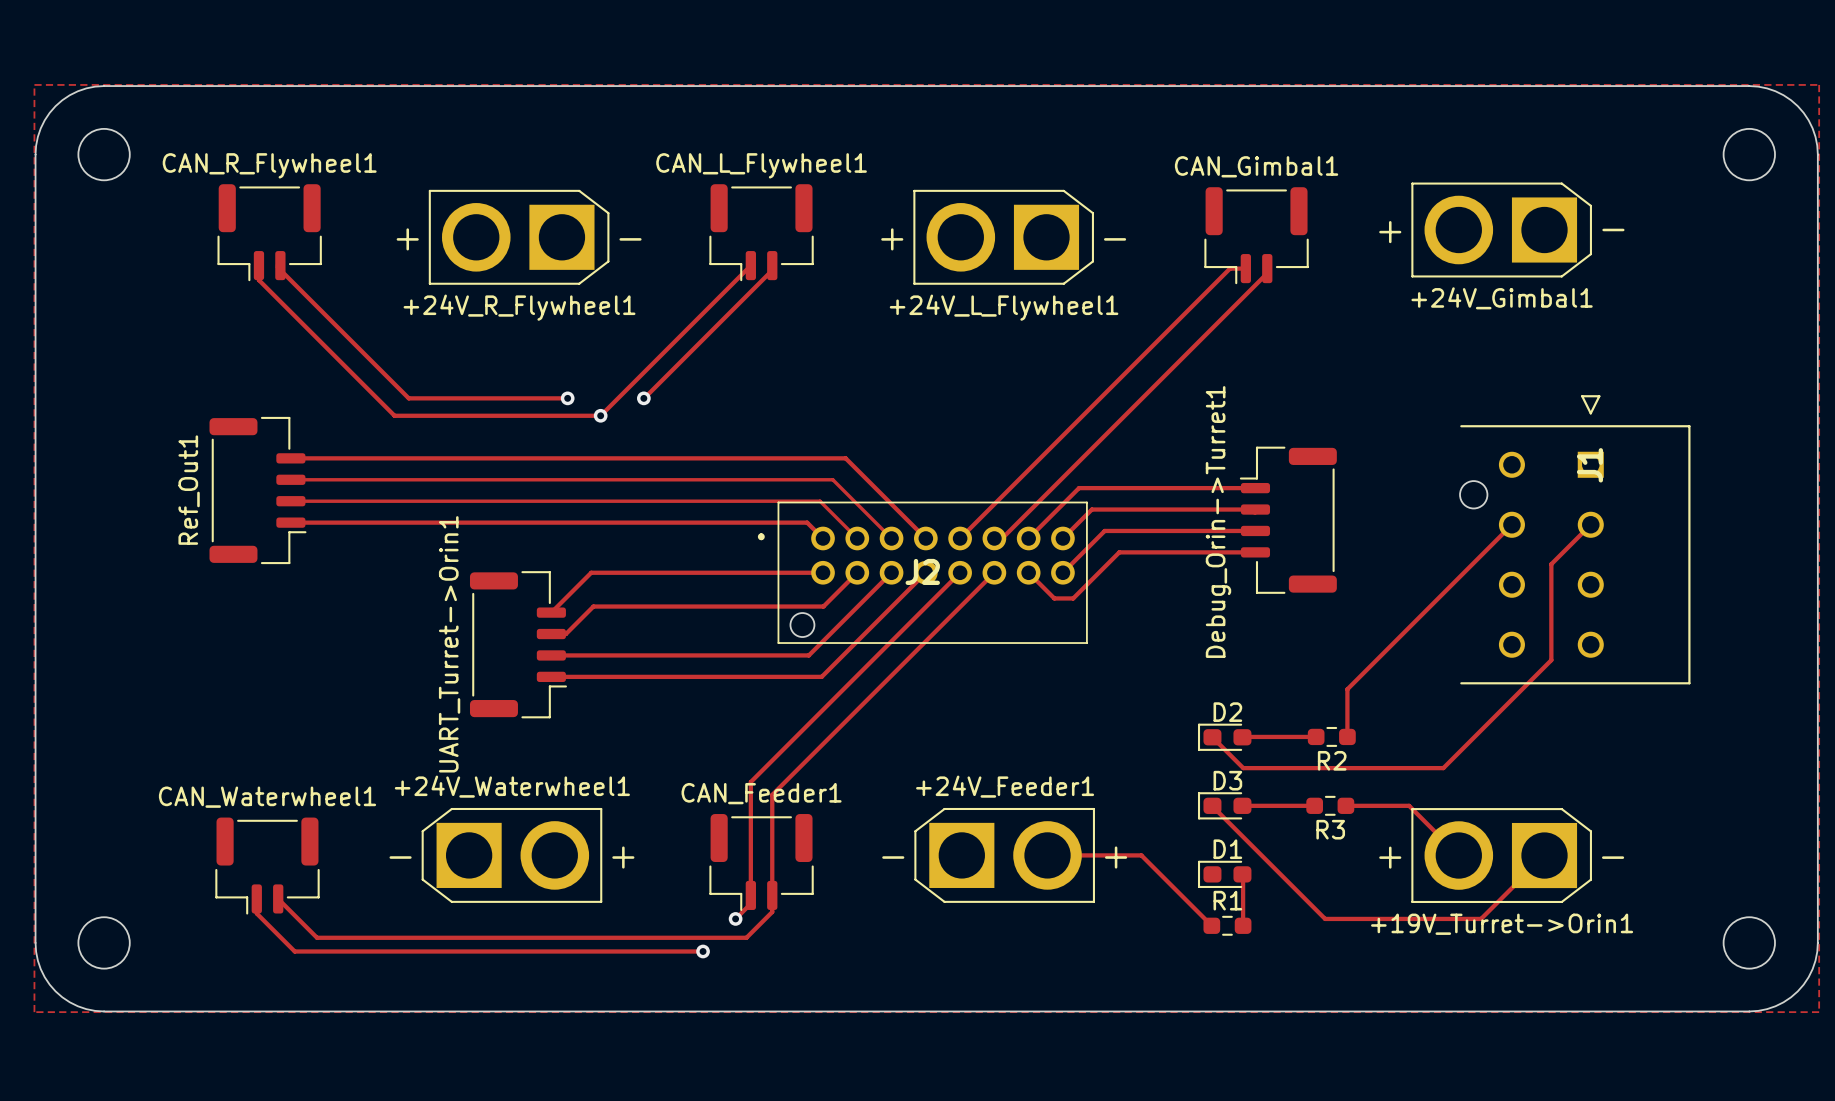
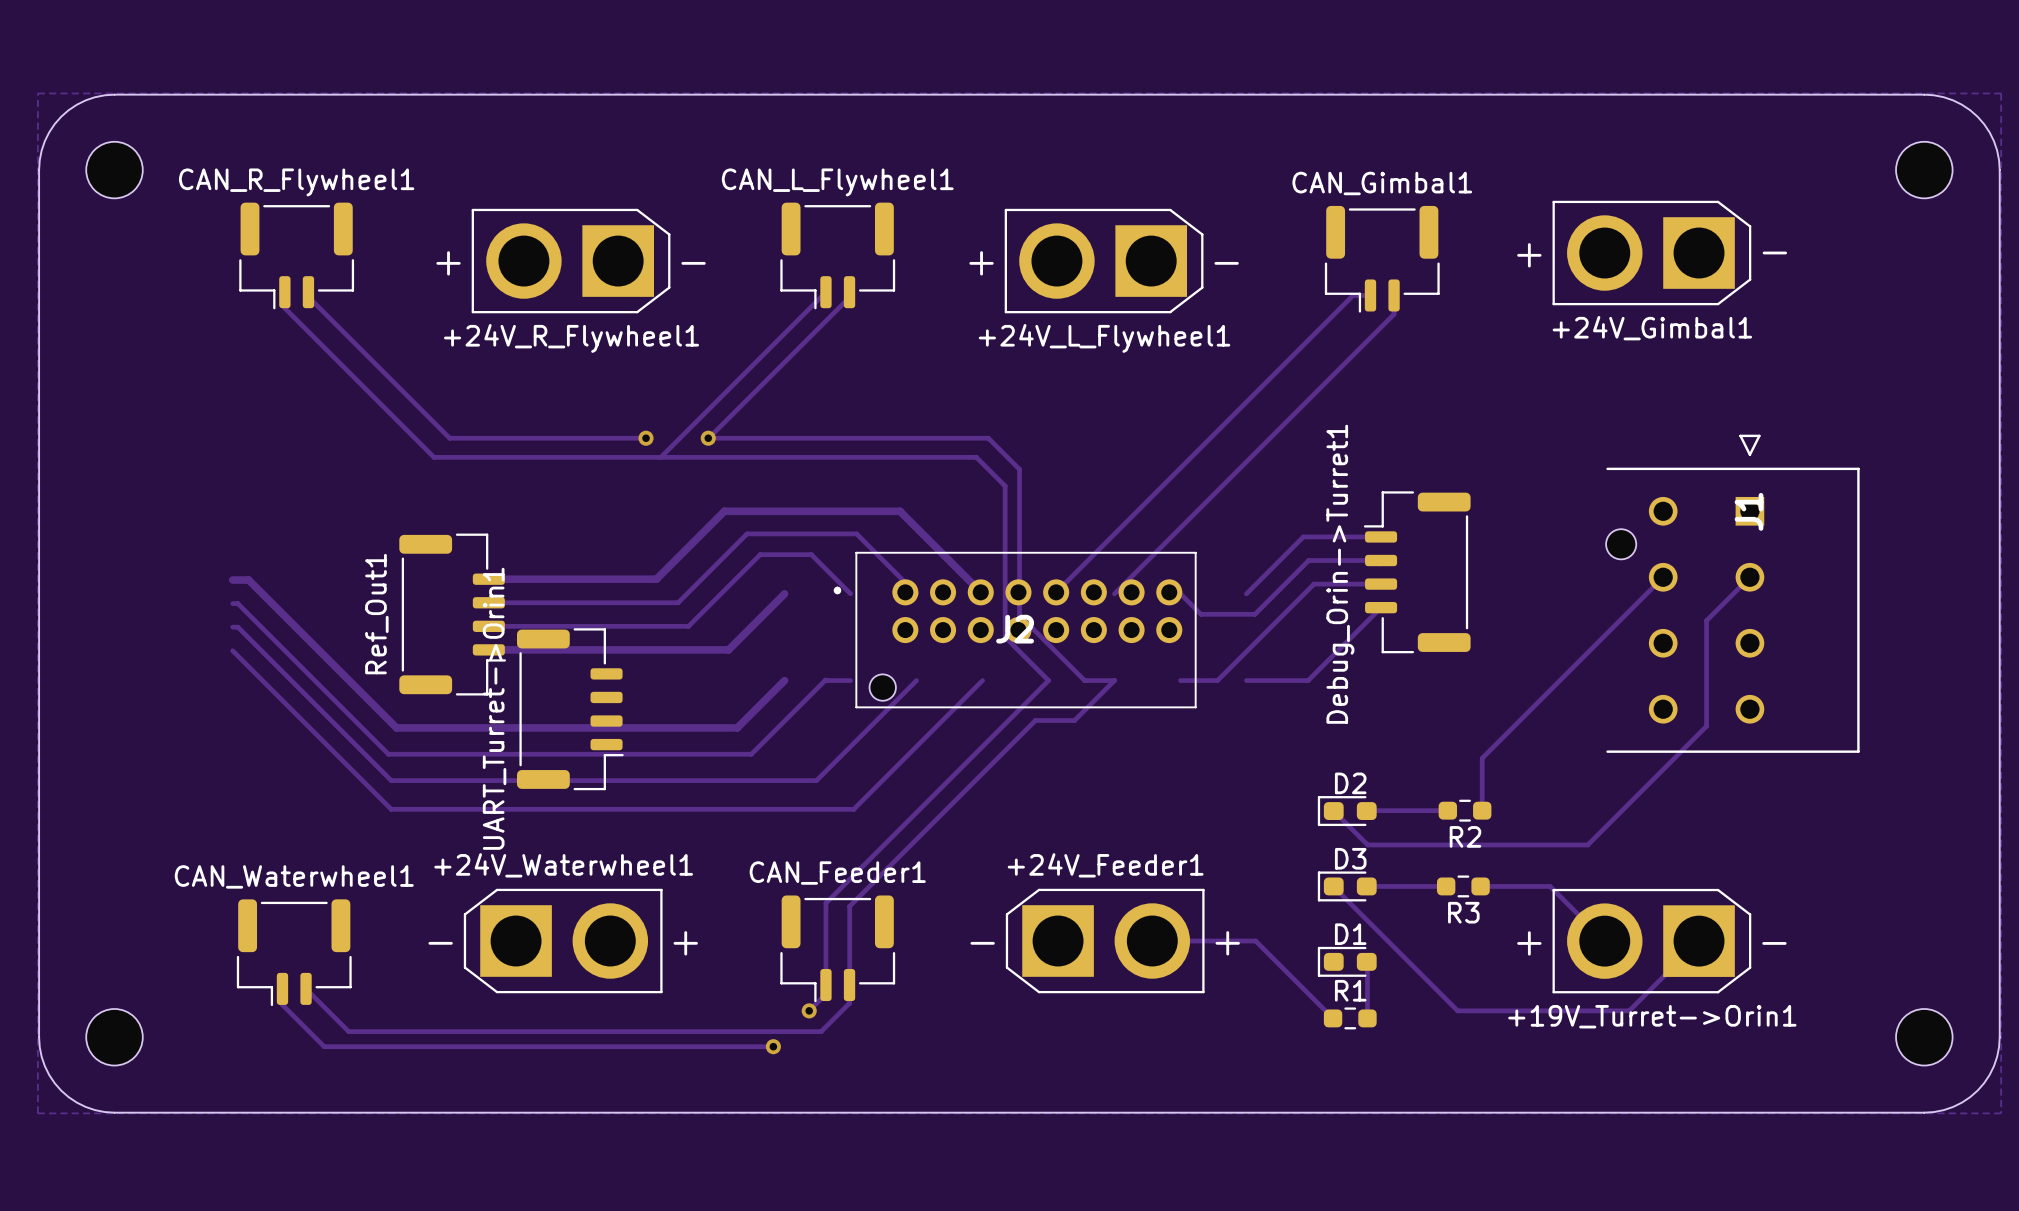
track: (1267, 273) (1002, 538) (994, 538) -> (1394, 300) (1394, 314) (1114, 593)
track: none -> (624, 438) (646, 438)
via: (567, 398) -> none
via: none -> (646, 438)
track: none -> (708, 438) (988, 438) (1019, 469) (1019, 615) (1084, 680) (1114, 680) (1074, 720) (1035, 720) (849, 906) (849, 989)
track: none -> (660, 457) (976, 457) (1005, 486) (1005, 637)
via: (600, 415) -> none
track: (290, 458) (845, 458) (925, 538) -> none
track: (290, 479) (832, 479) (891, 538) -> none
track: (1184, 488) (1079, 488) (1028, 538) -> (1303, 536) (1246, 593)
Ref_Out1 position: (257, 490) -> (452, 614)
track: (290, 501) (820, 501) (857, 538) -> none
track: (1189, 509) (1091, 509) (1062, 538) -> (1308, 560) (1254, 614) (1200, 614) (1180, 593)
track: (290, 522) (807, 522) (823, 538) -> none
track: none -> (488, 579) (656, 579) (724, 511) (900, 511) (982, 593)
track: none -> (232, 580) (248, 580) (396, 727) (737, 727) (784, 680)
track: (1194, 530) (1104, 530) (1062, 572) -> (1314, 584) (1217, 680) (1180, 680)
track: none -> (784, 593) (728, 649) (488, 649)
track: none -> (850, 593) (811, 554) (760, 554) (688, 626) (488, 626)
track: none -> (916, 593) (856, 533) (746, 533) (678, 602) (488, 602)
track: none -> (232, 603) (237, 603) (388, 754) (751, 754) (825, 680) (850, 680)
track: (1255, 552) (1119, 552) (1073, 598) (1054, 598) (1028, 572) -> (1381, 607) (1308, 680) (1246, 680)
track: none -> (232, 627) (237, 627) (391, 780) (816, 780) (916, 680)
track: (823, 572) (591, 572) (551, 612) -> none
track: (857, 572) (823, 606) (593, 606) (565, 634) (551, 634) -> none
track: (891, 572) (808, 655) (551, 655) -> none
track: (925, 572) (821, 676) (551, 676) -> none
track: (960, 572) (750, 782) (750, 820) -> (1005, 637) (1048, 680) (825, 903)
track: (994, 572) (772, 794) (772, 895) -> none
track: none -> (232, 650) (391, 809) (853, 809) (982, 680)

